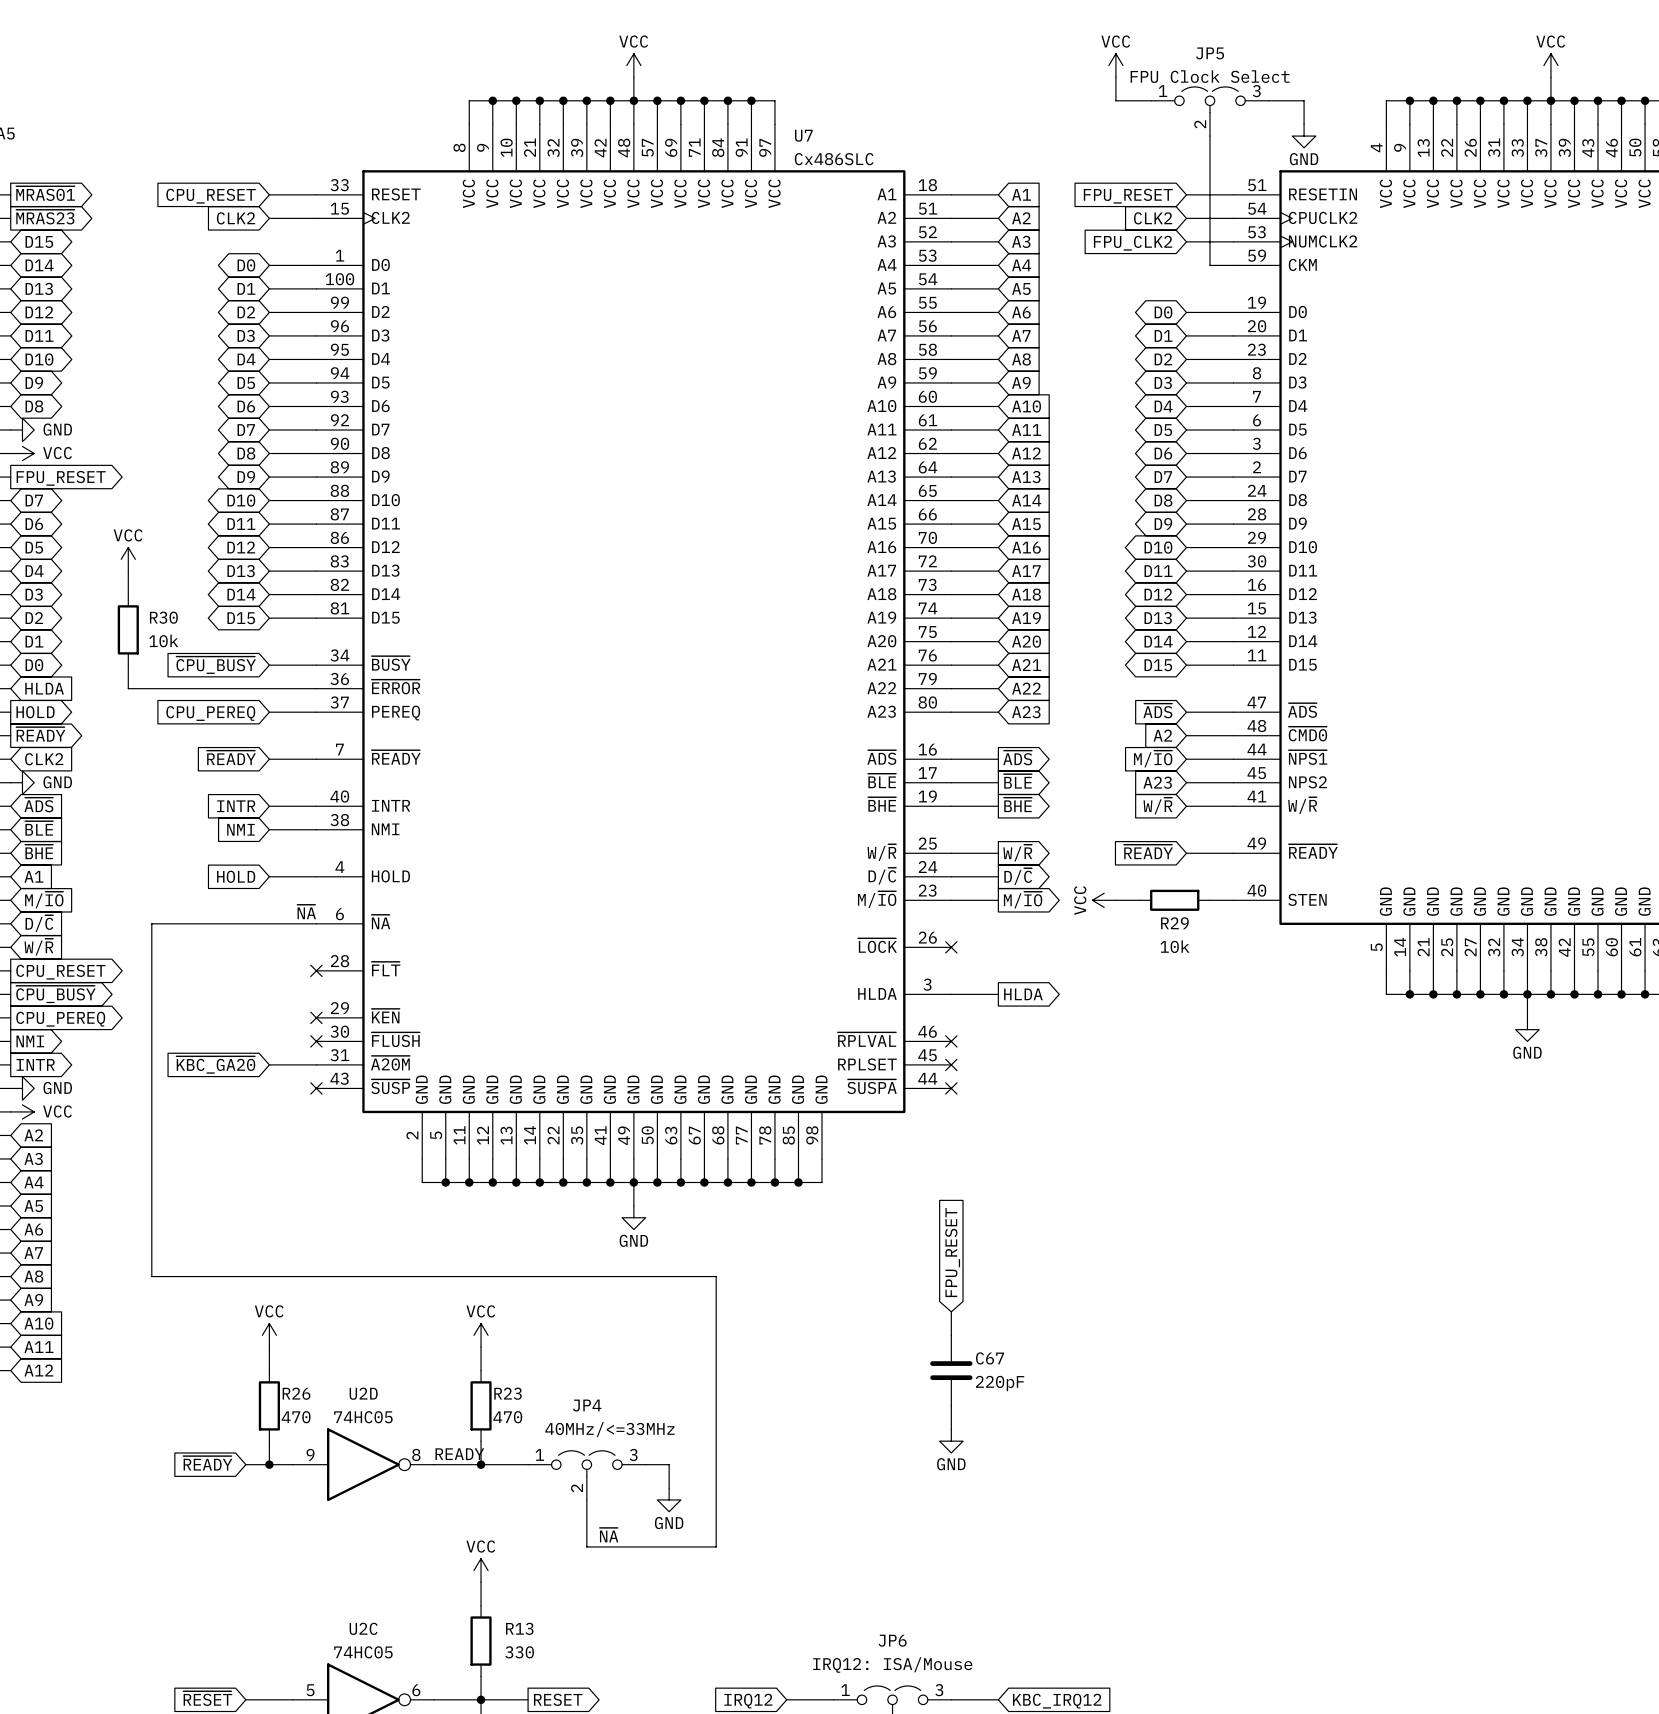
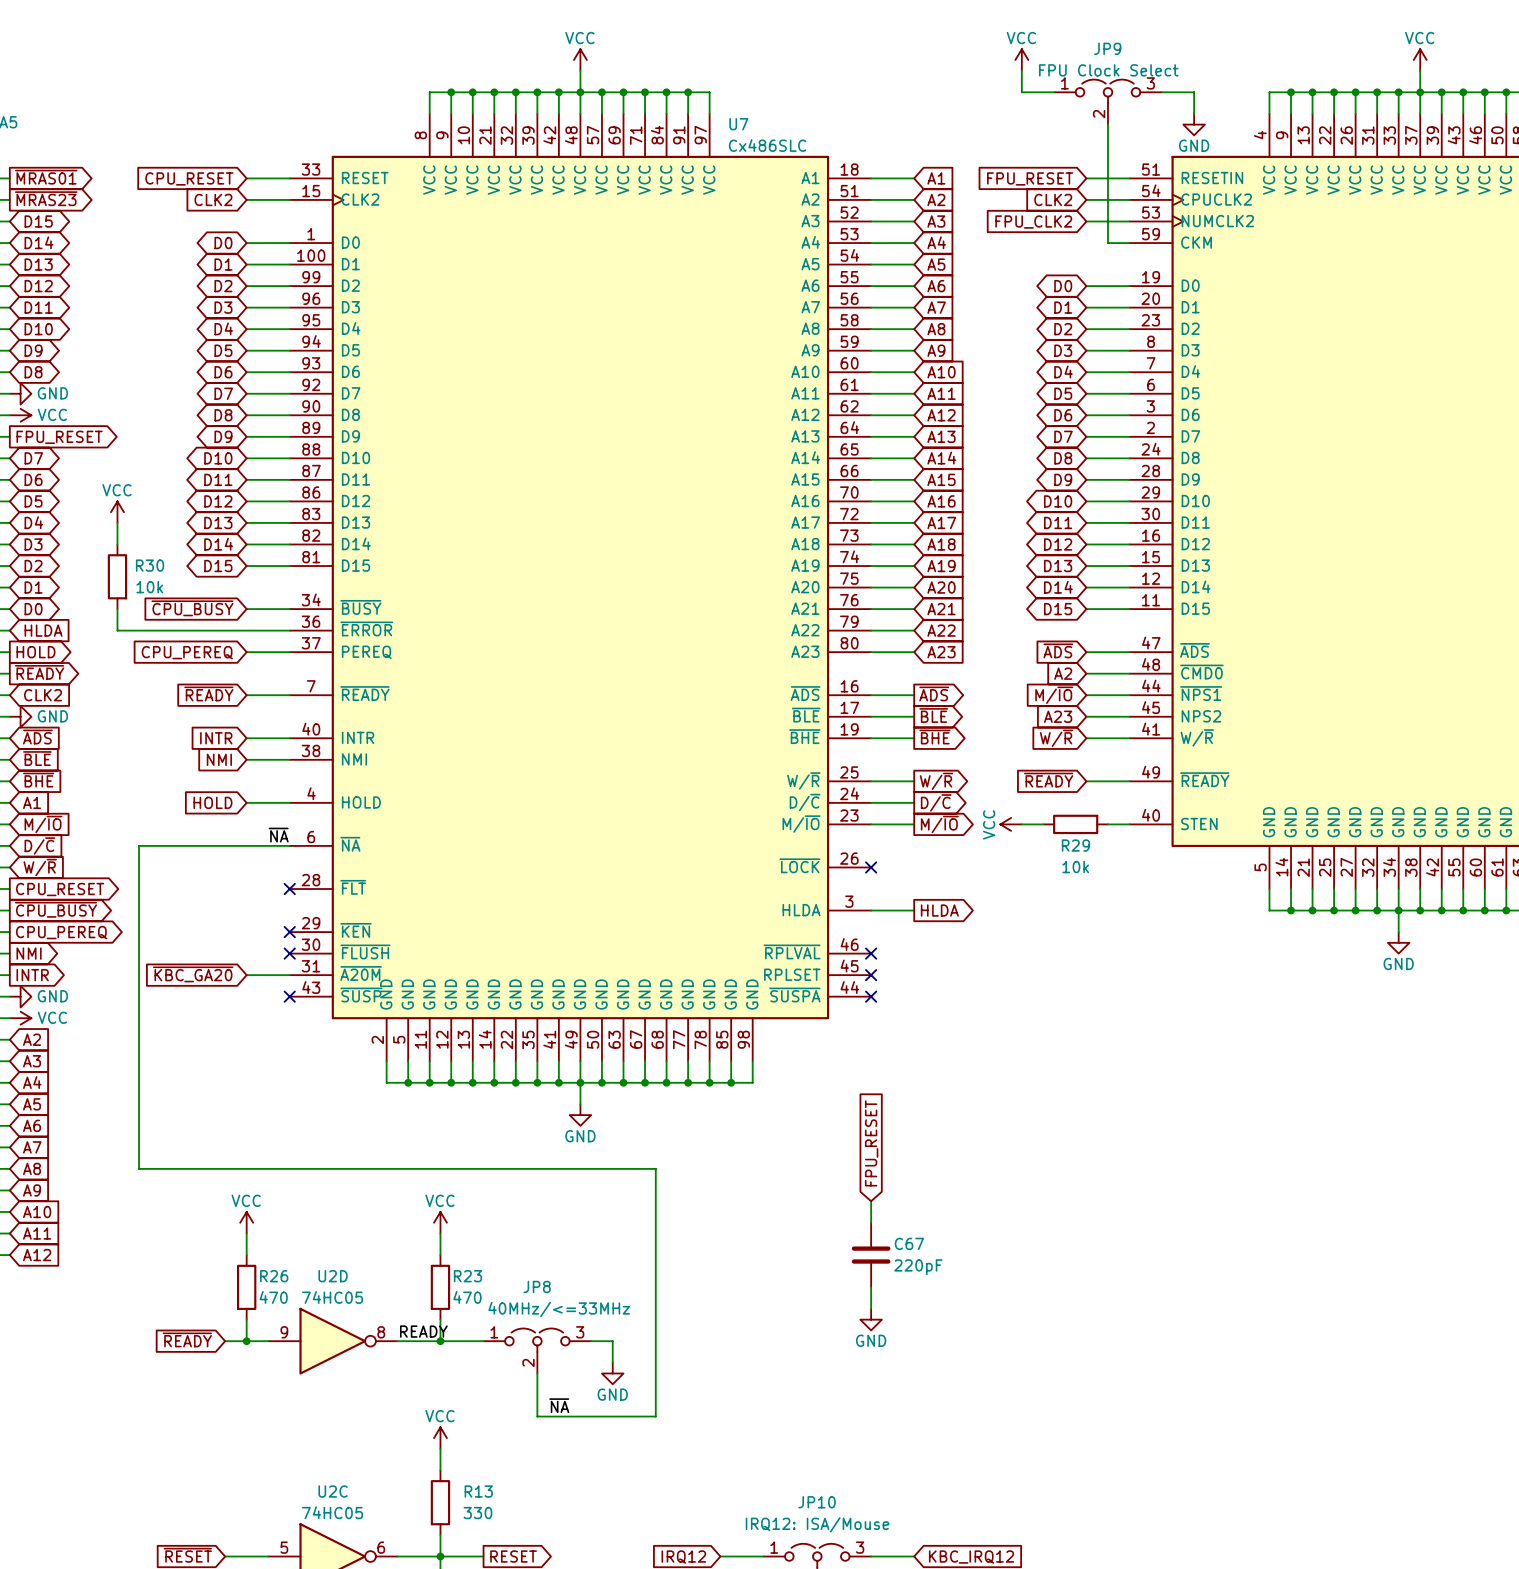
JP5 name: JP5 (1210, 53) -> JP9 (1107, 48)
JP4 name: JP4 (587, 1405) -> JP8 (537, 1286)
JP6 name: JP6 (892, 1640) -> JP10 (817, 1502)

